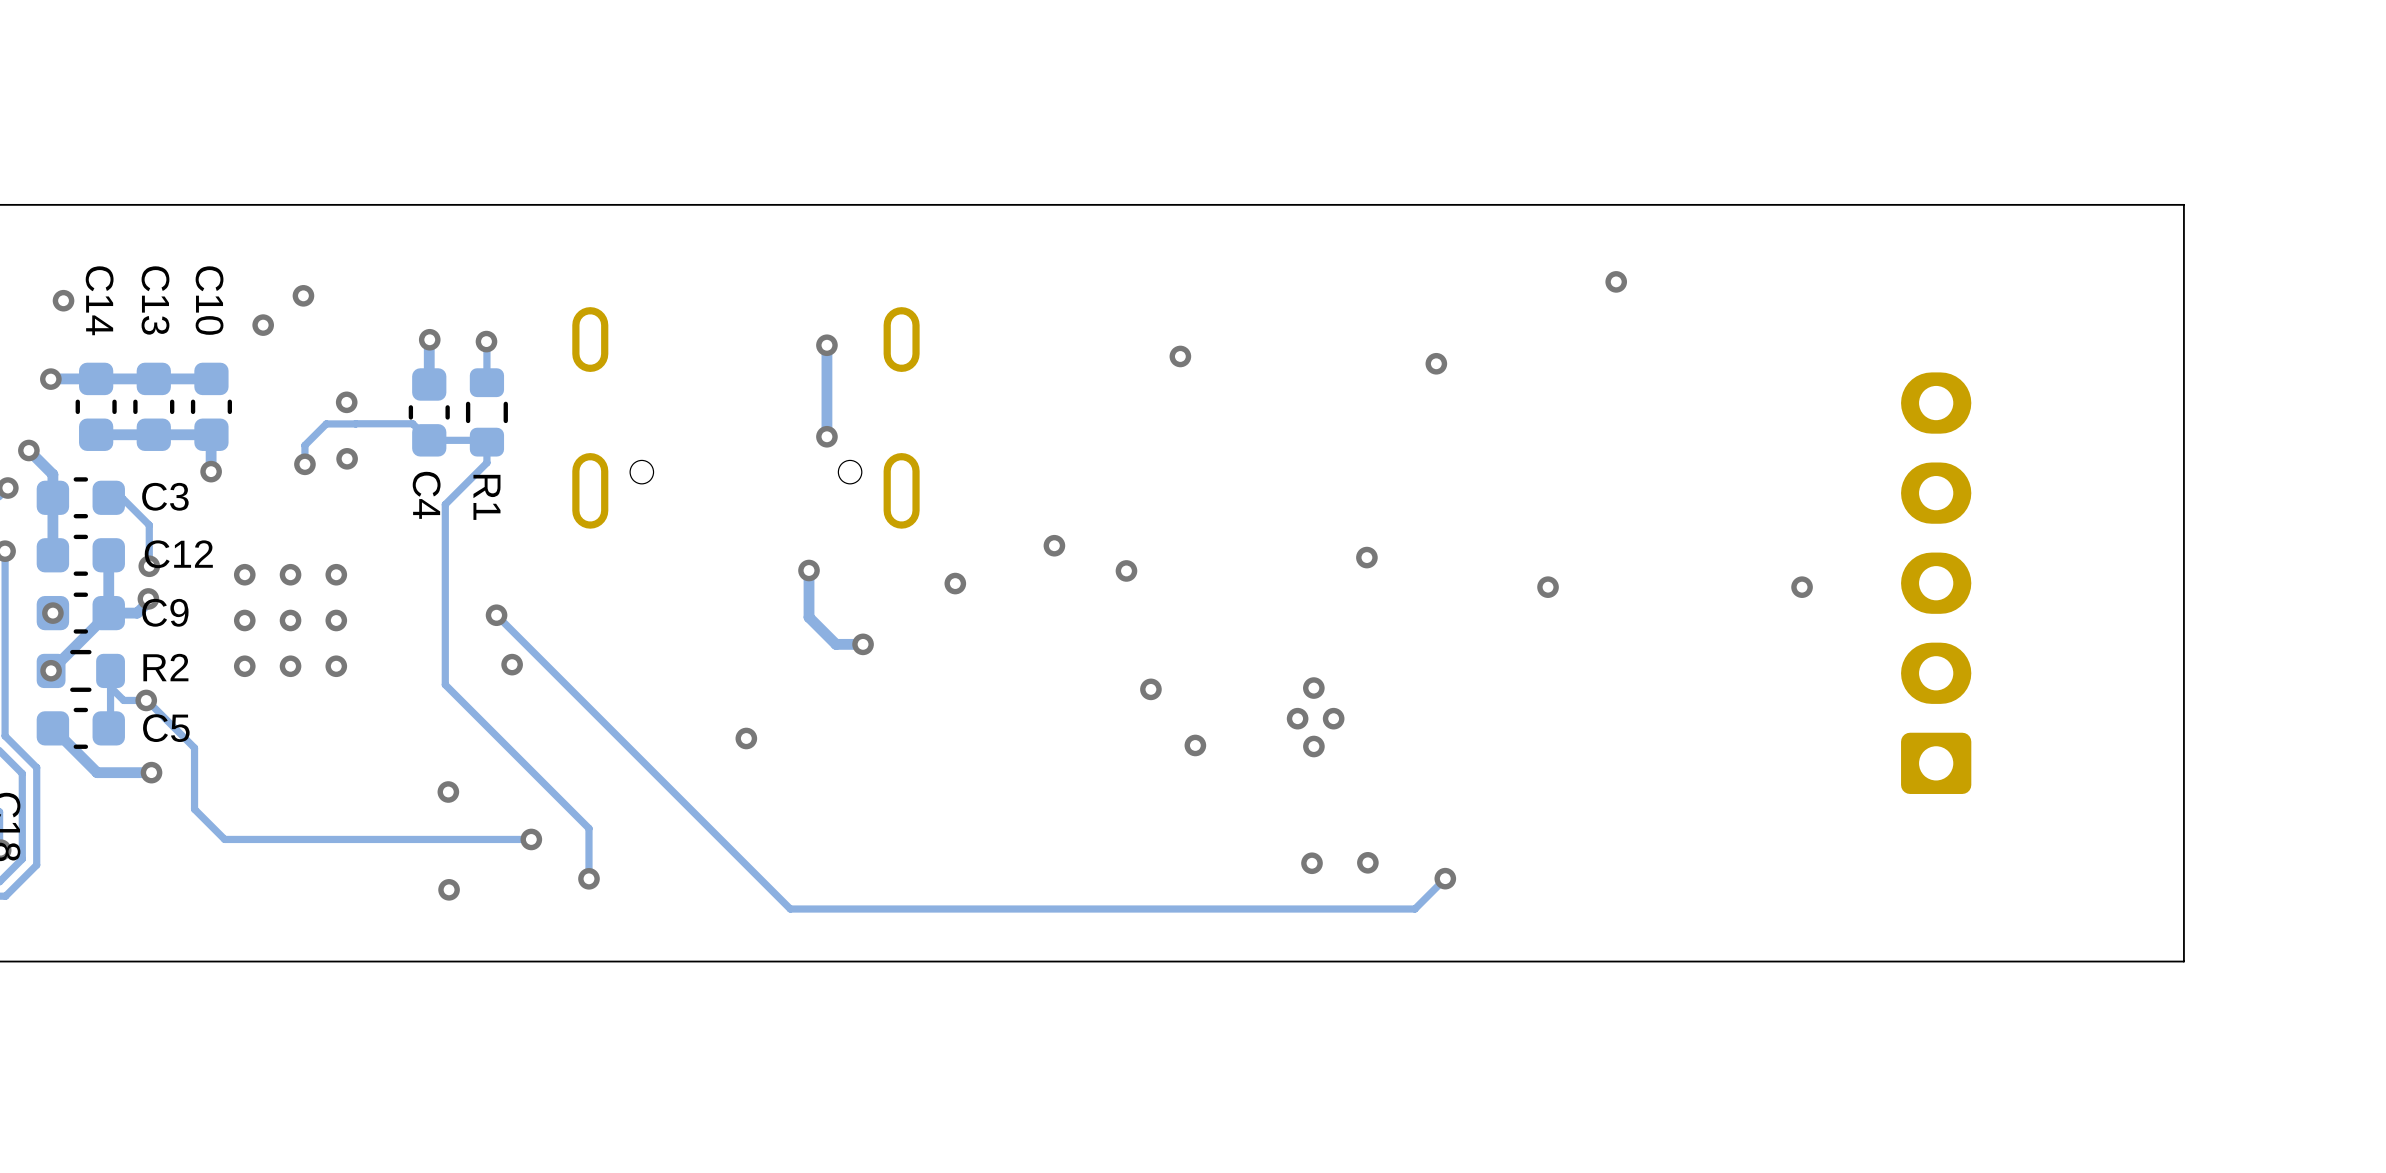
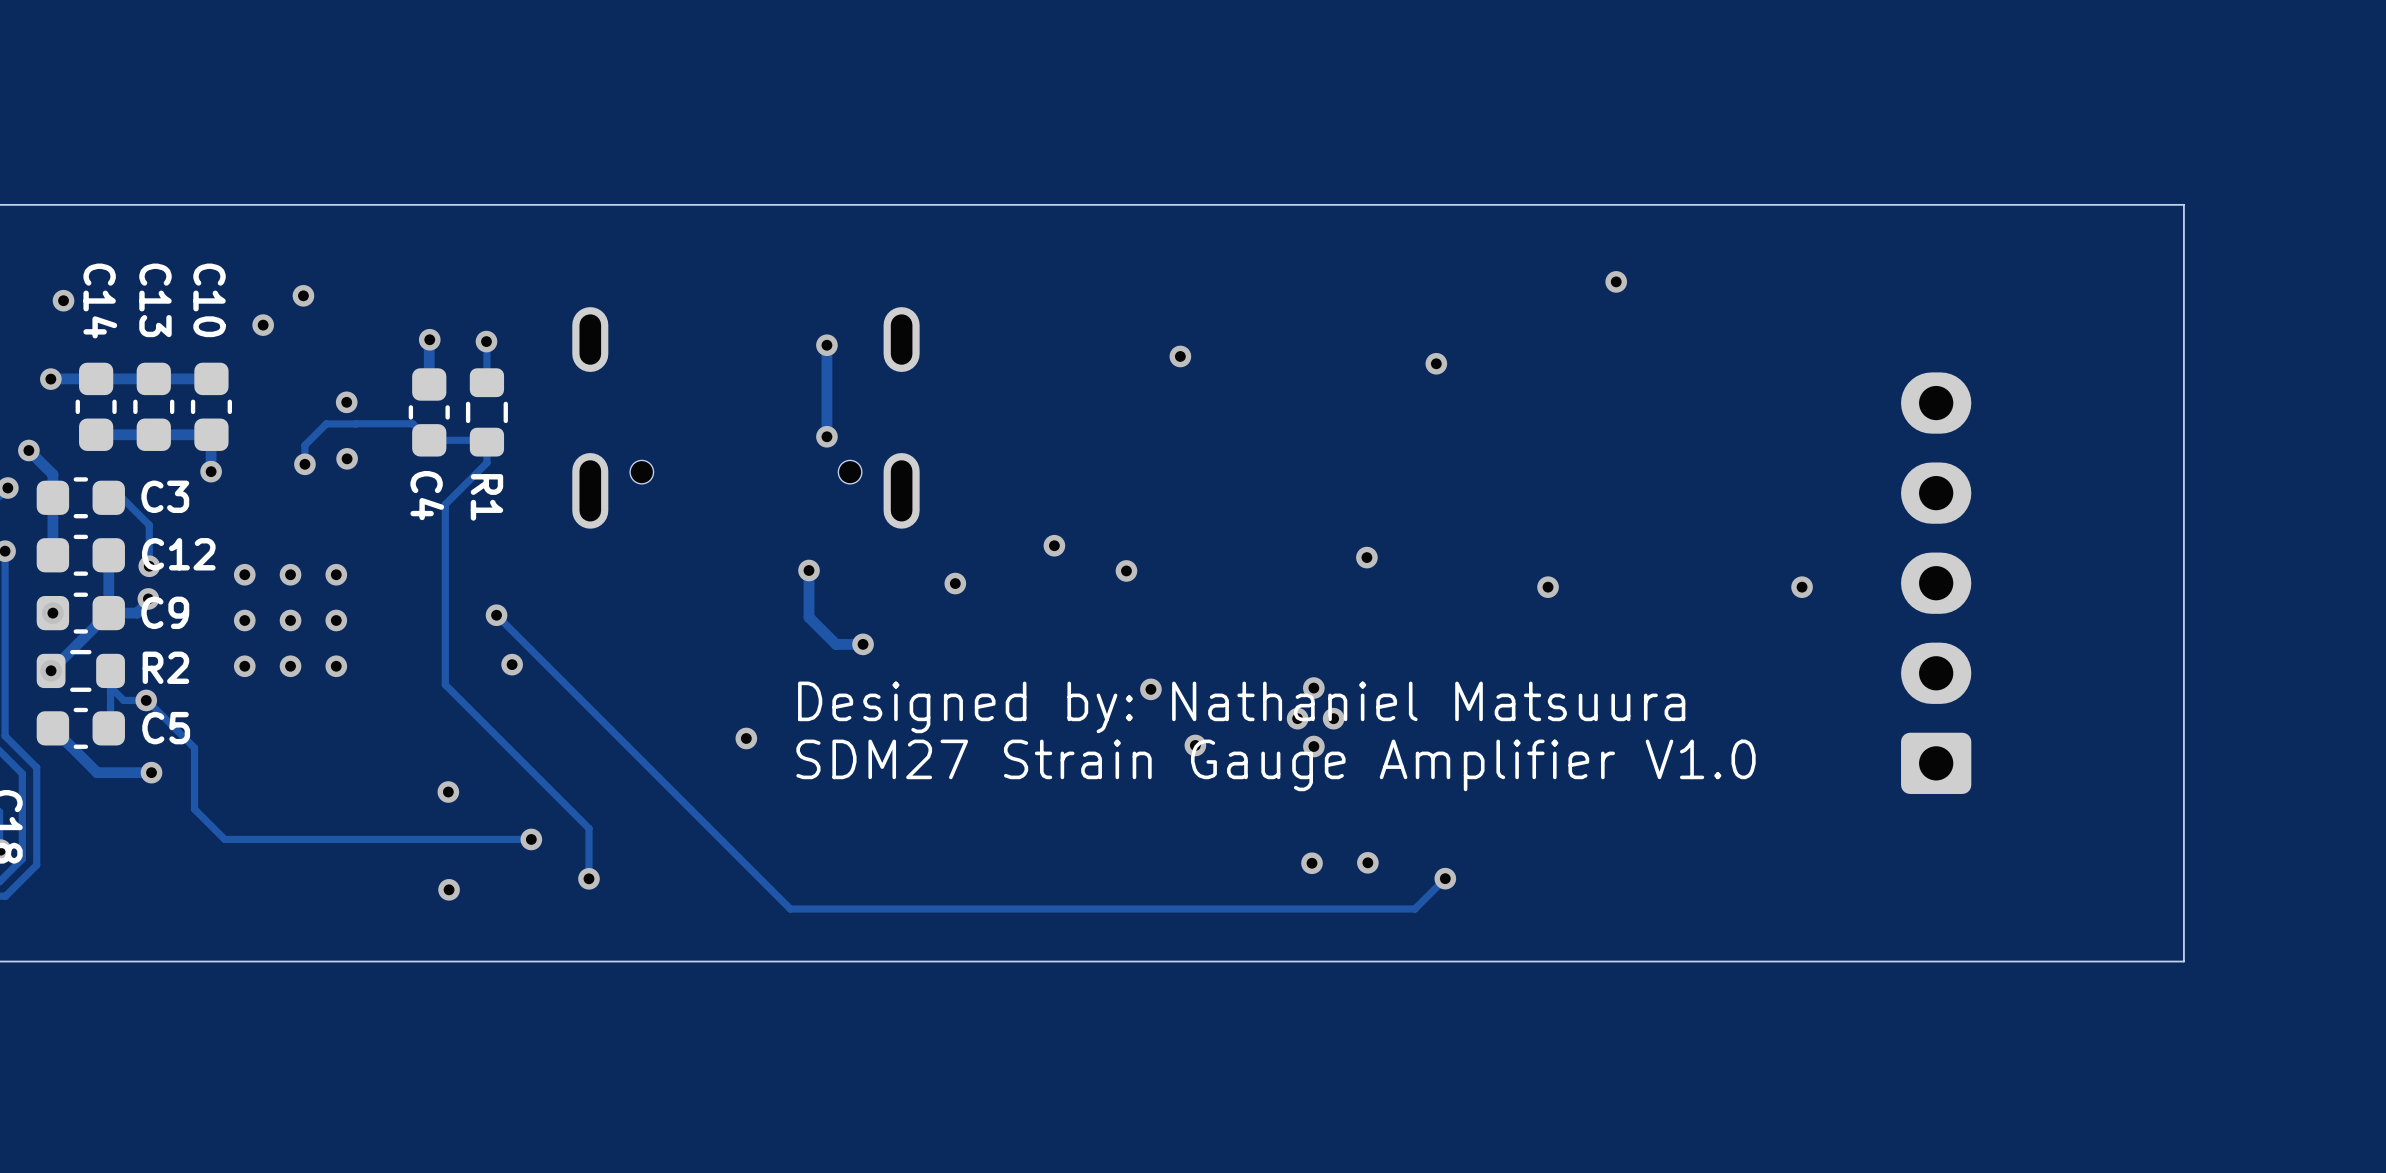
text: none -> Designed by: Nathaniel Matsuura (1241, 707)
text: none -> SDM27 Strain Gauge Amplifier V1.0 (1276, 765)

